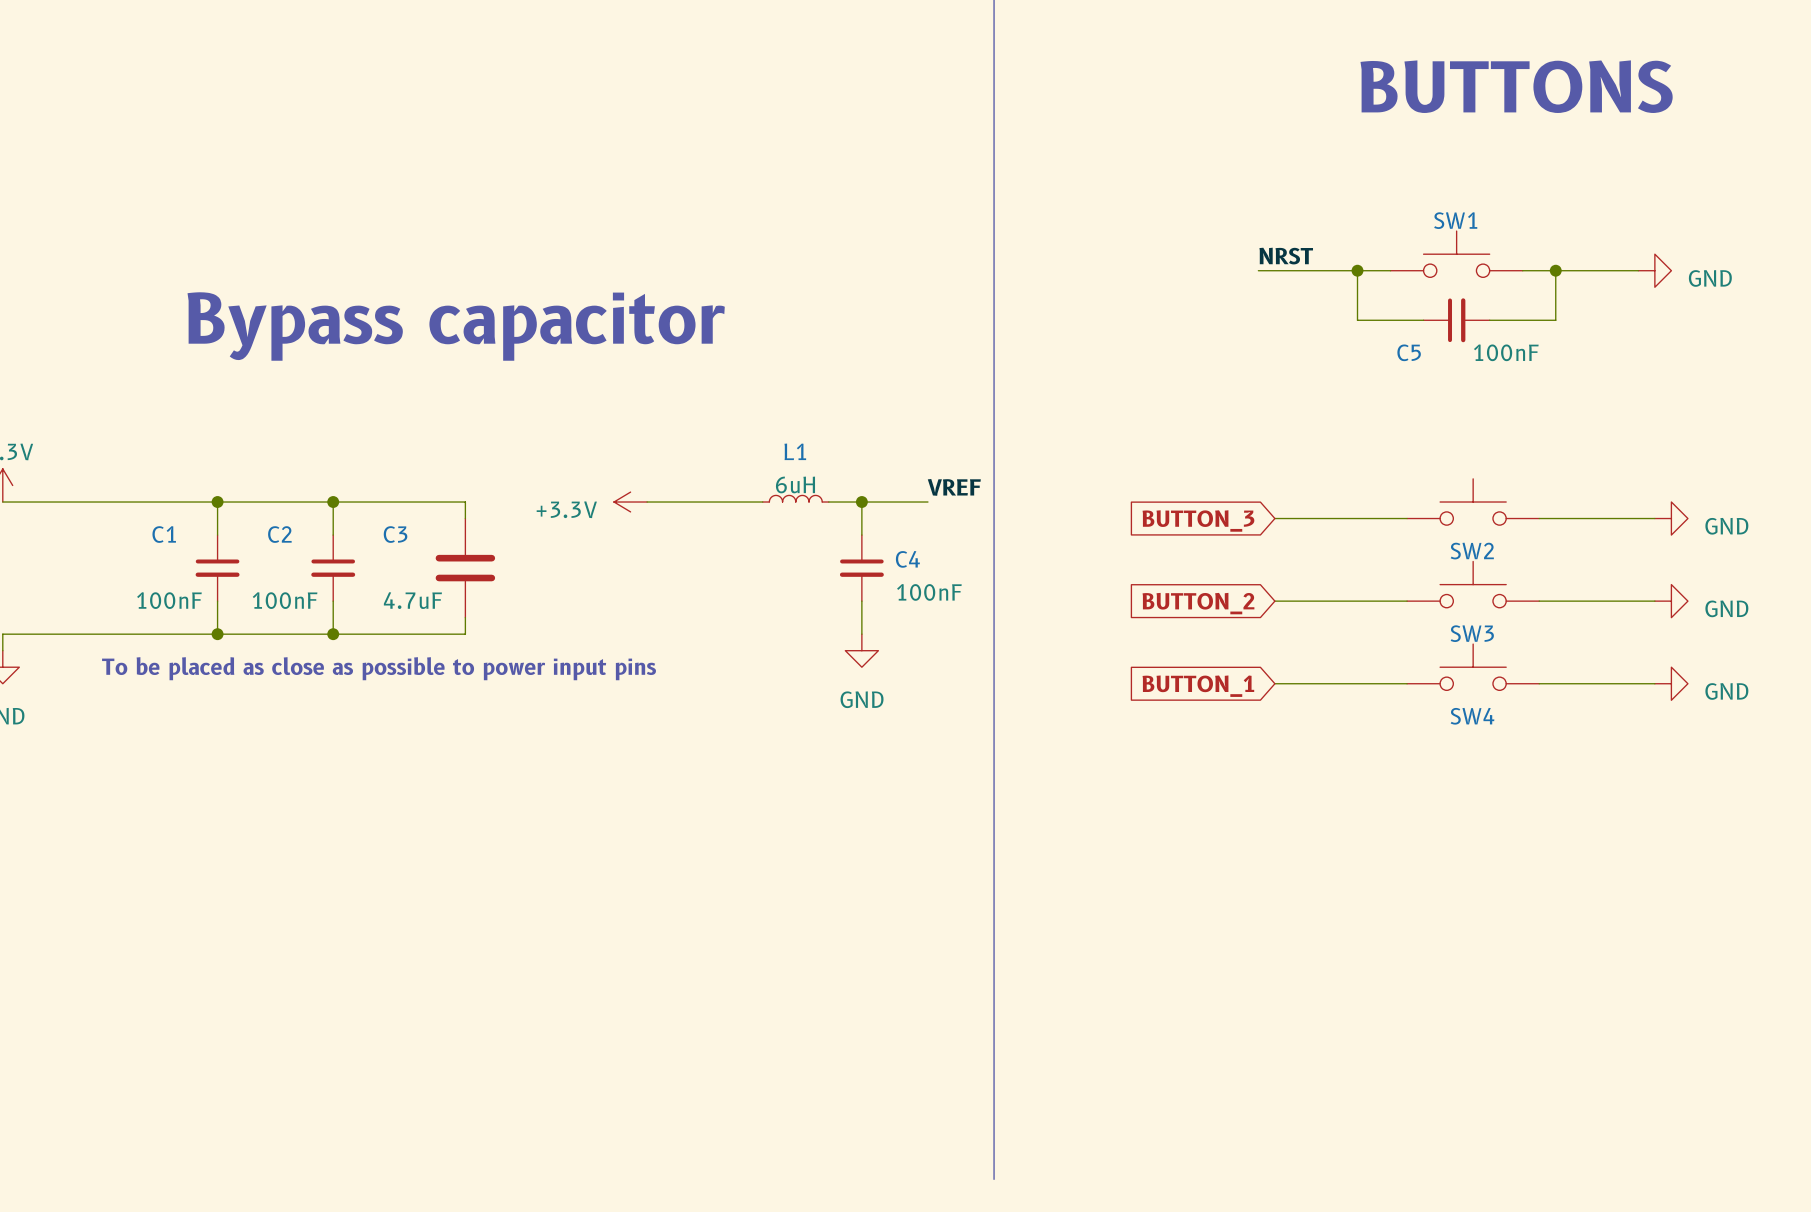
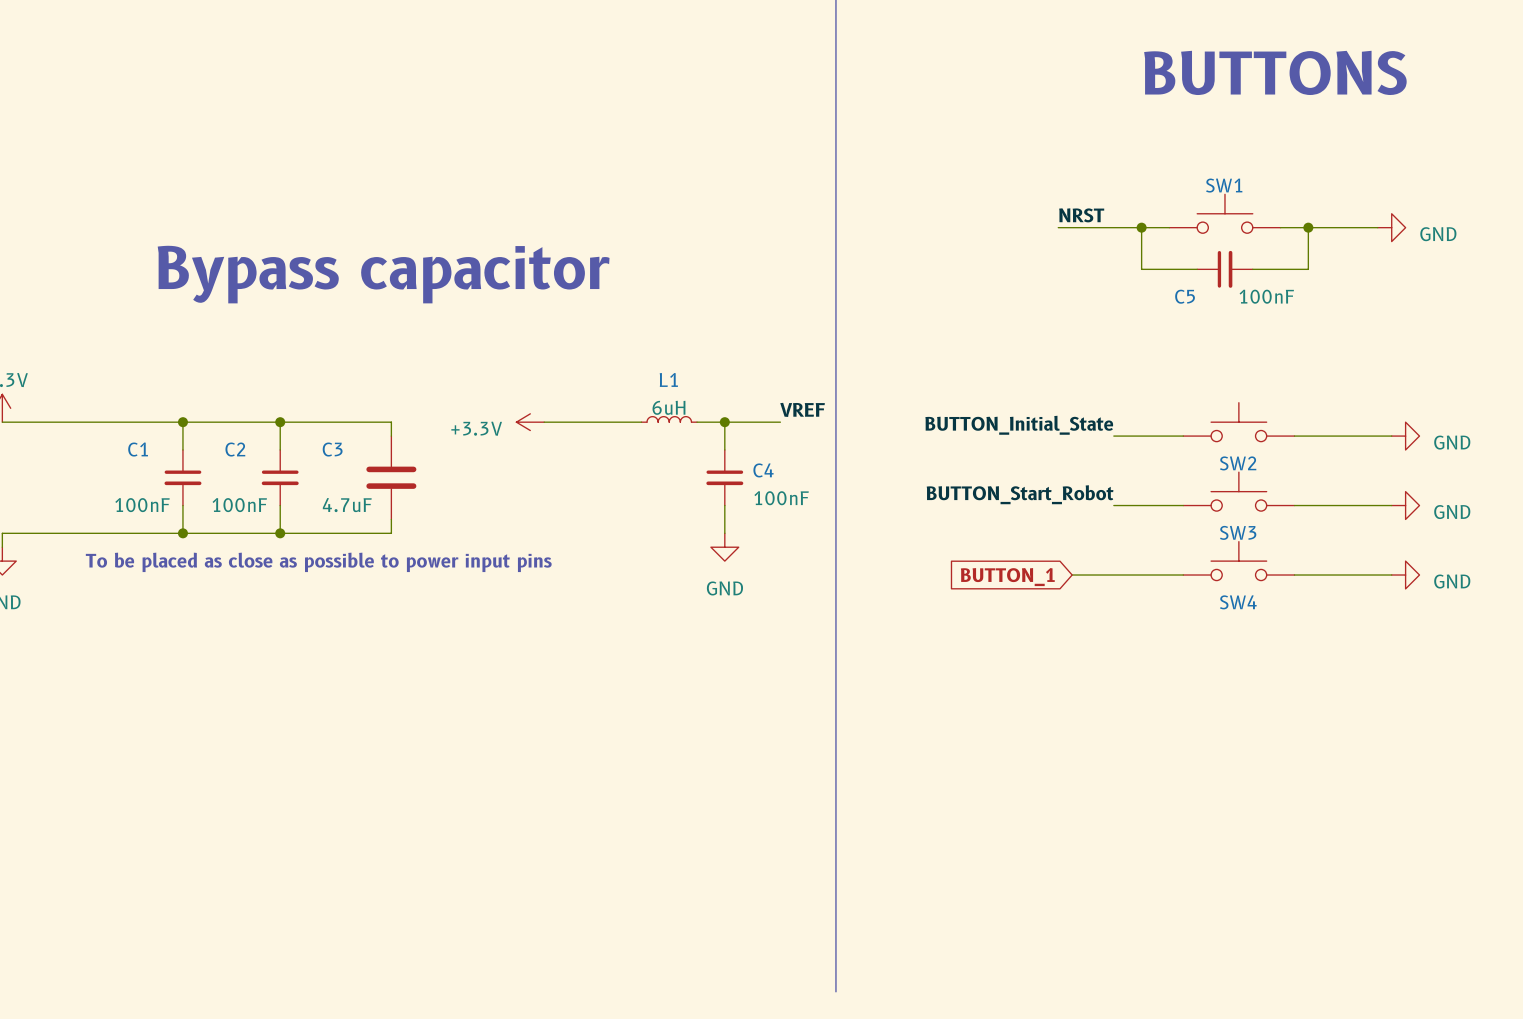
label: none -> BUTTON_Initial_State (1019, 425)
wire: (1274, 518) (1324, 518) -> none
global label: BUTTON_3 (1198, 520) -> none
label: none -> BUTTON_Start_Robot (1020, 494)
wire: (1274, 601) (1324, 601) -> none
global label: BUTTON_2 (1198, 603) -> none

